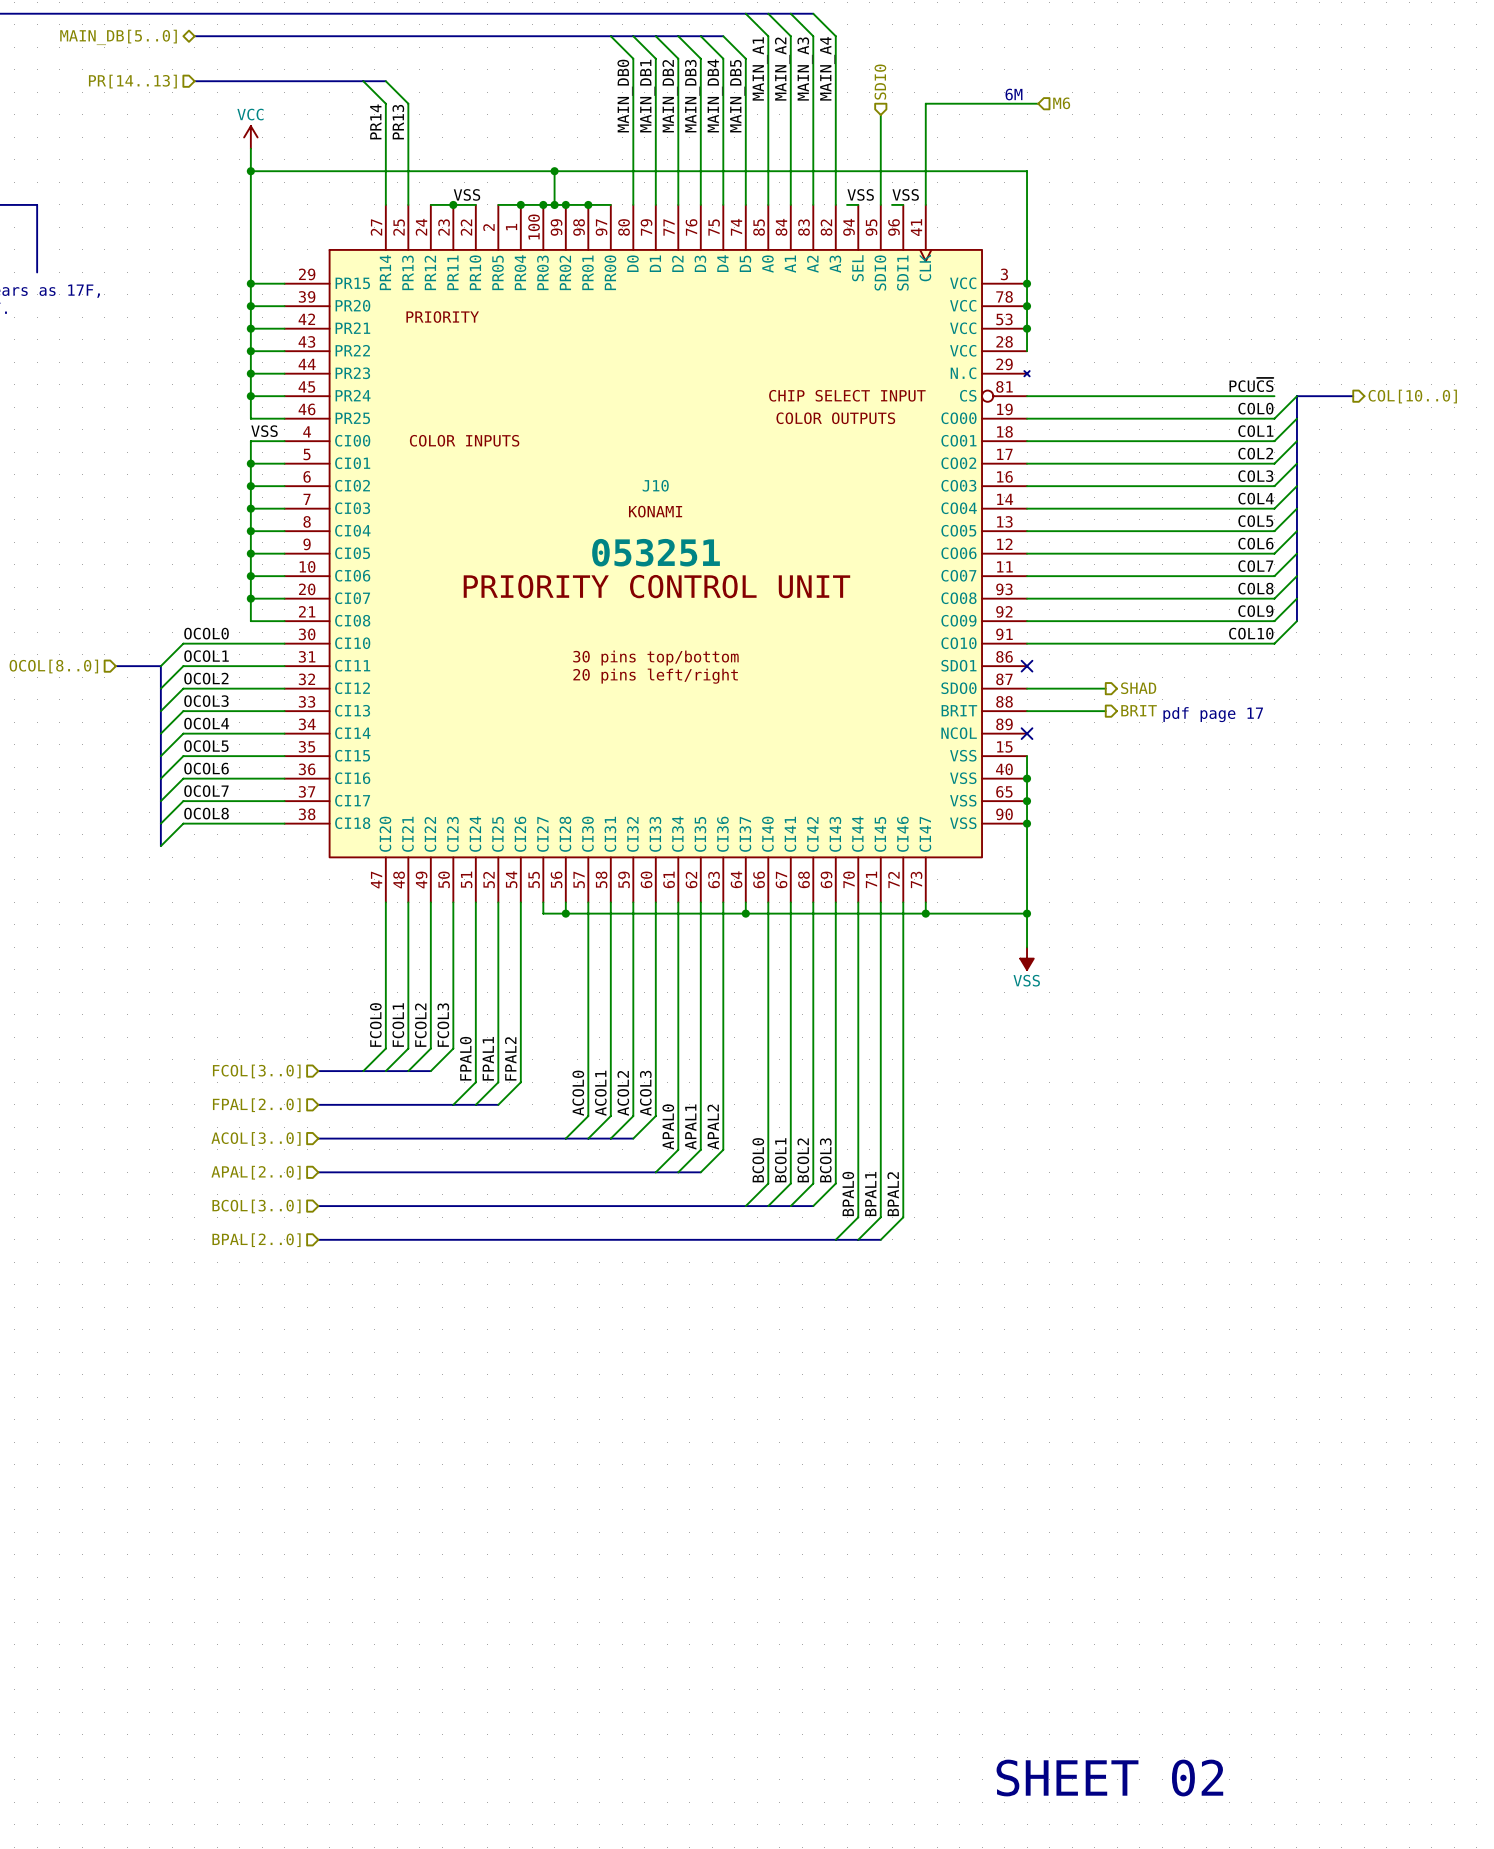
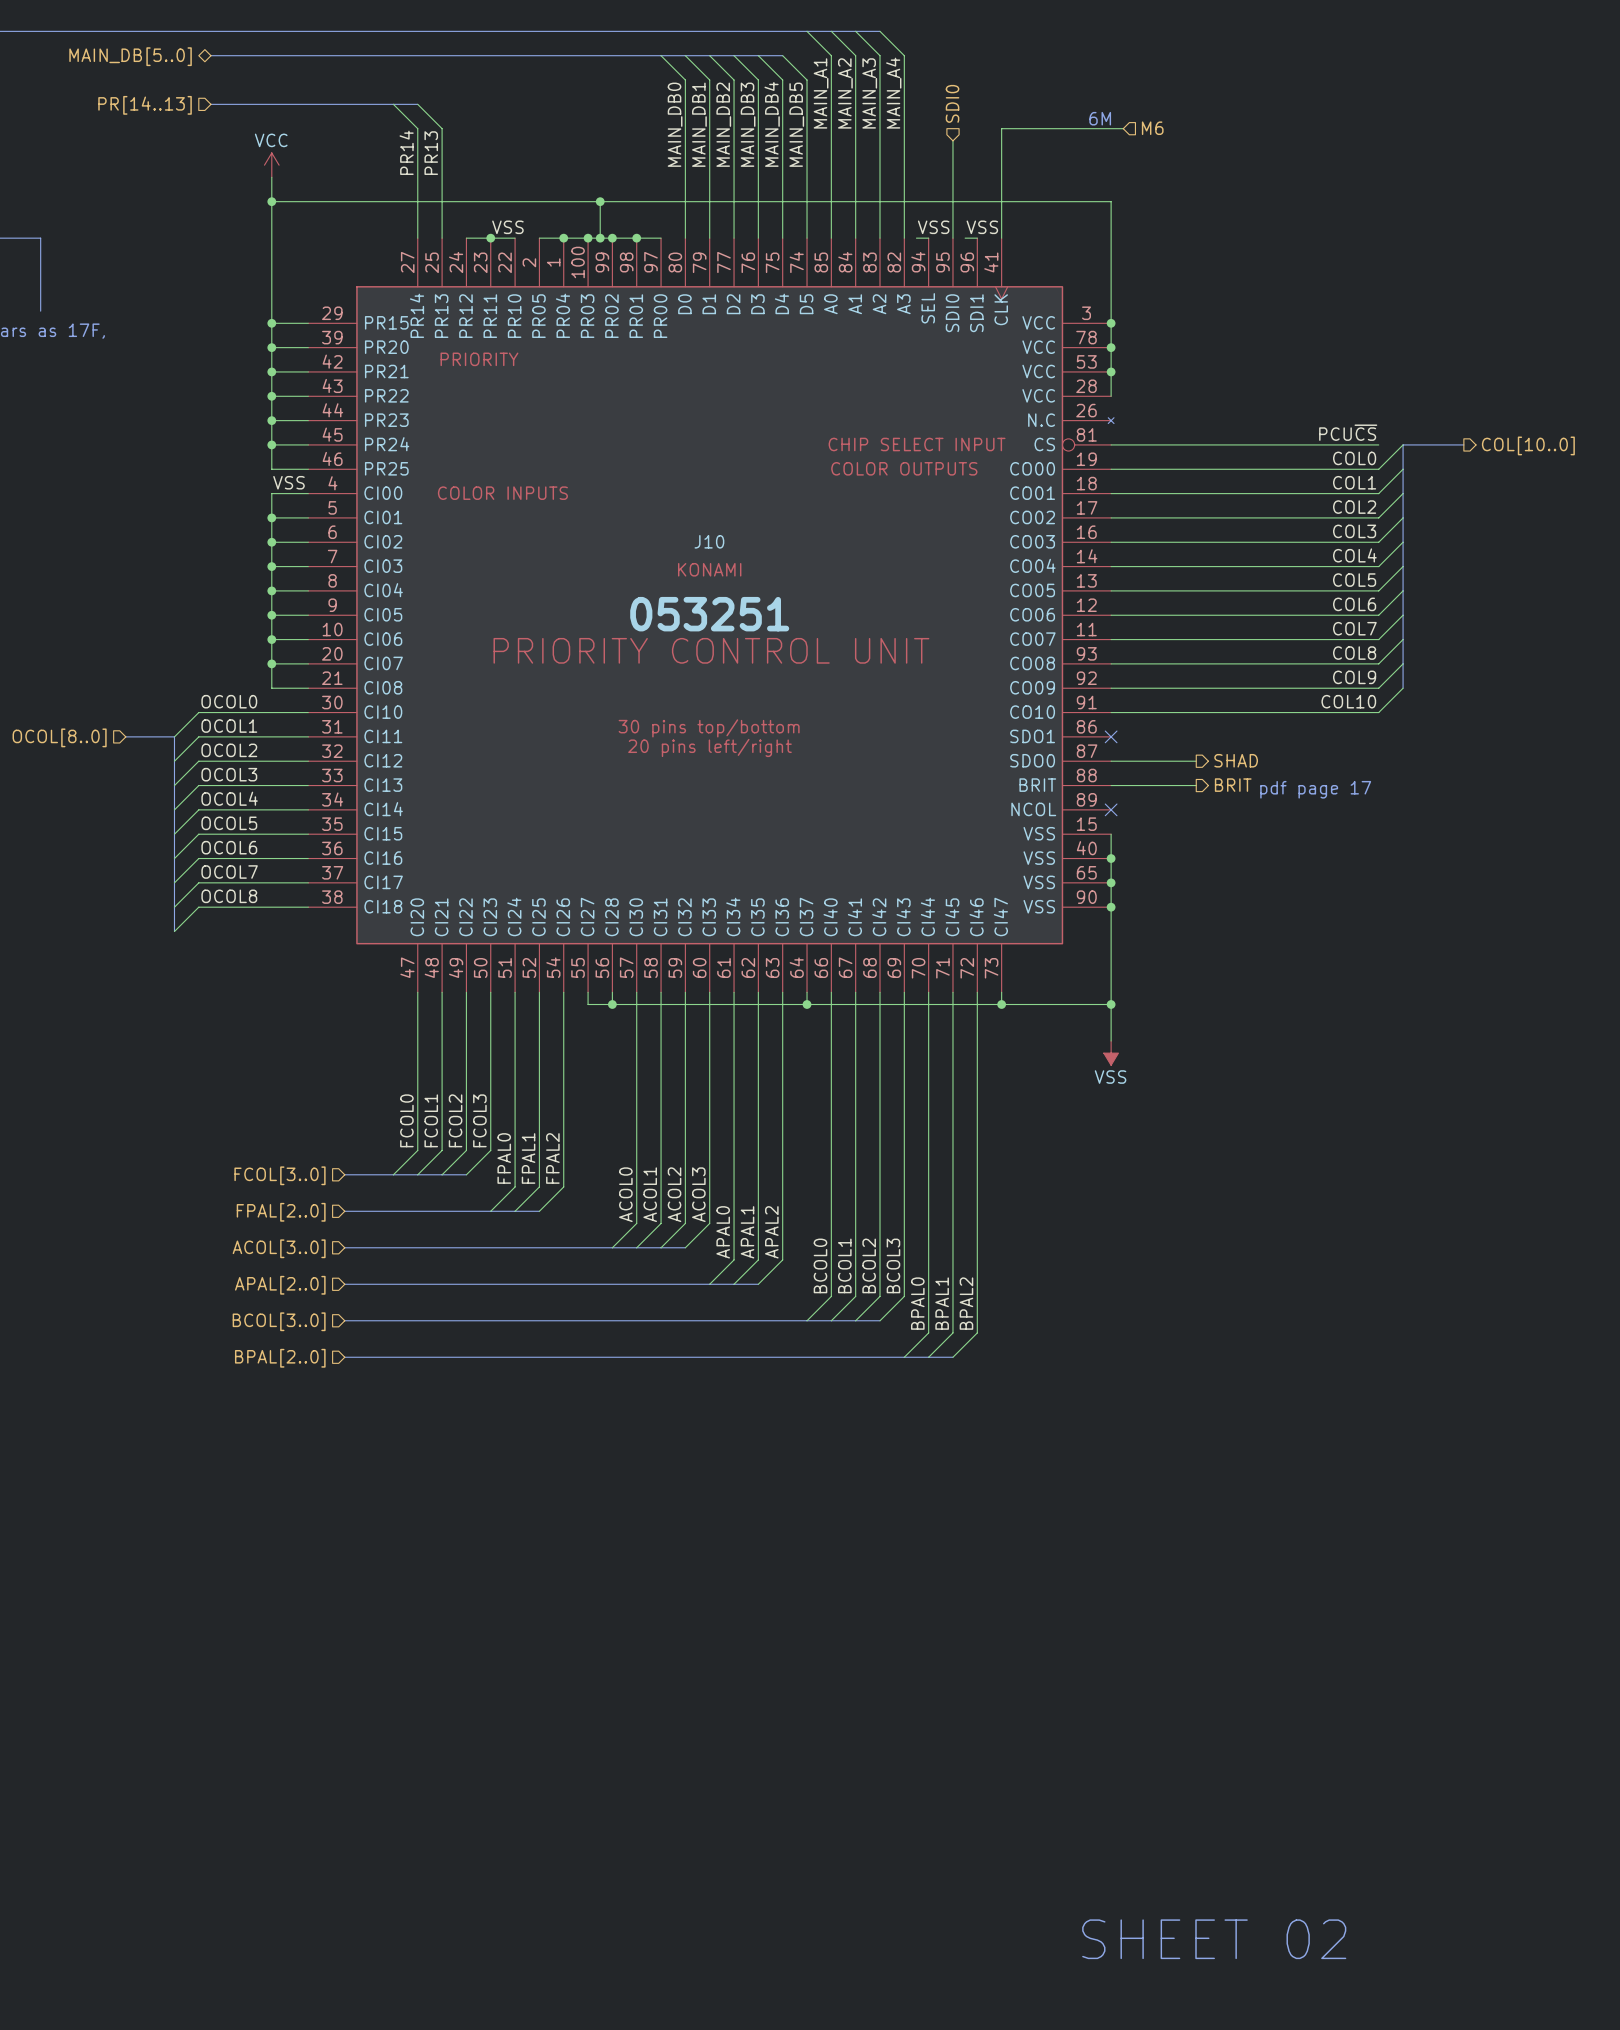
J10 pin number: 29 (1004, 364) -> 26 (1086, 410)

